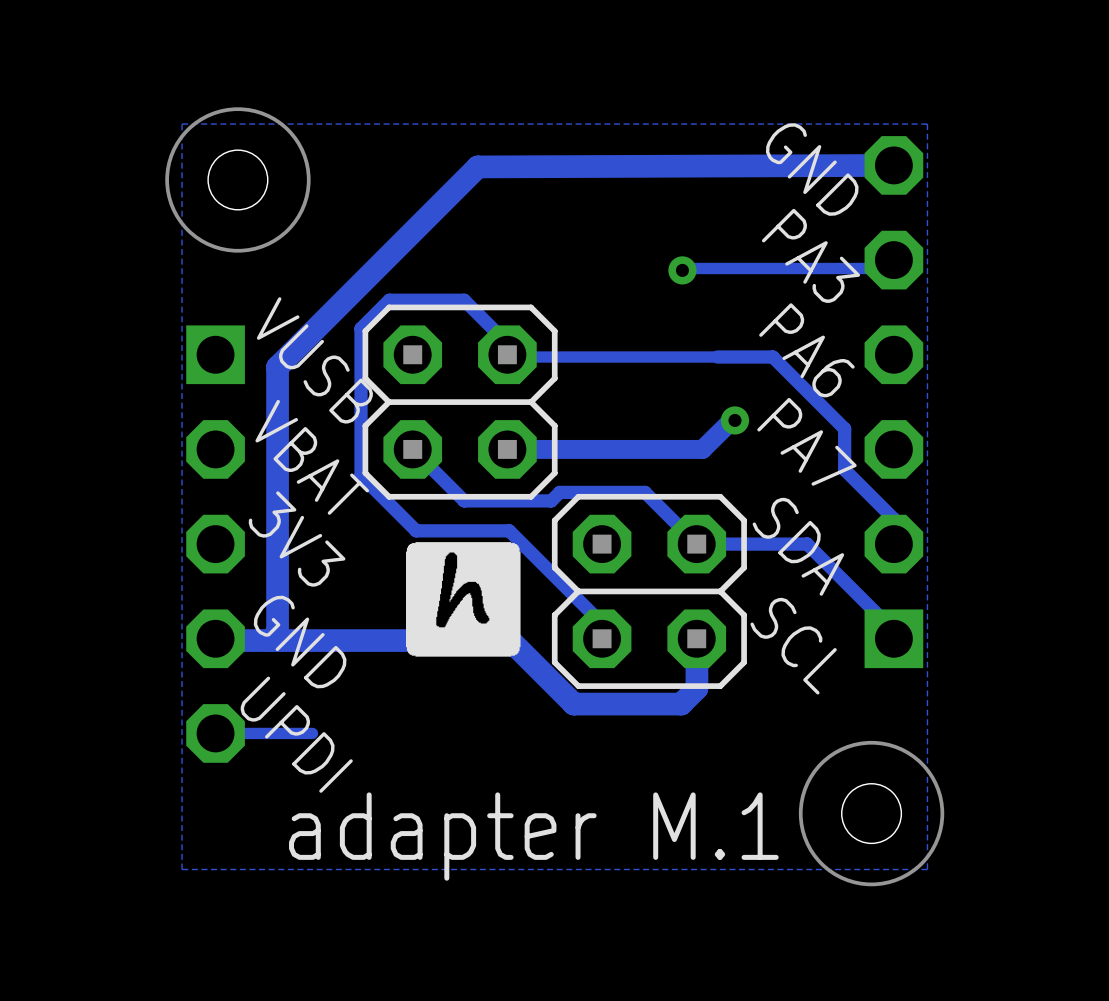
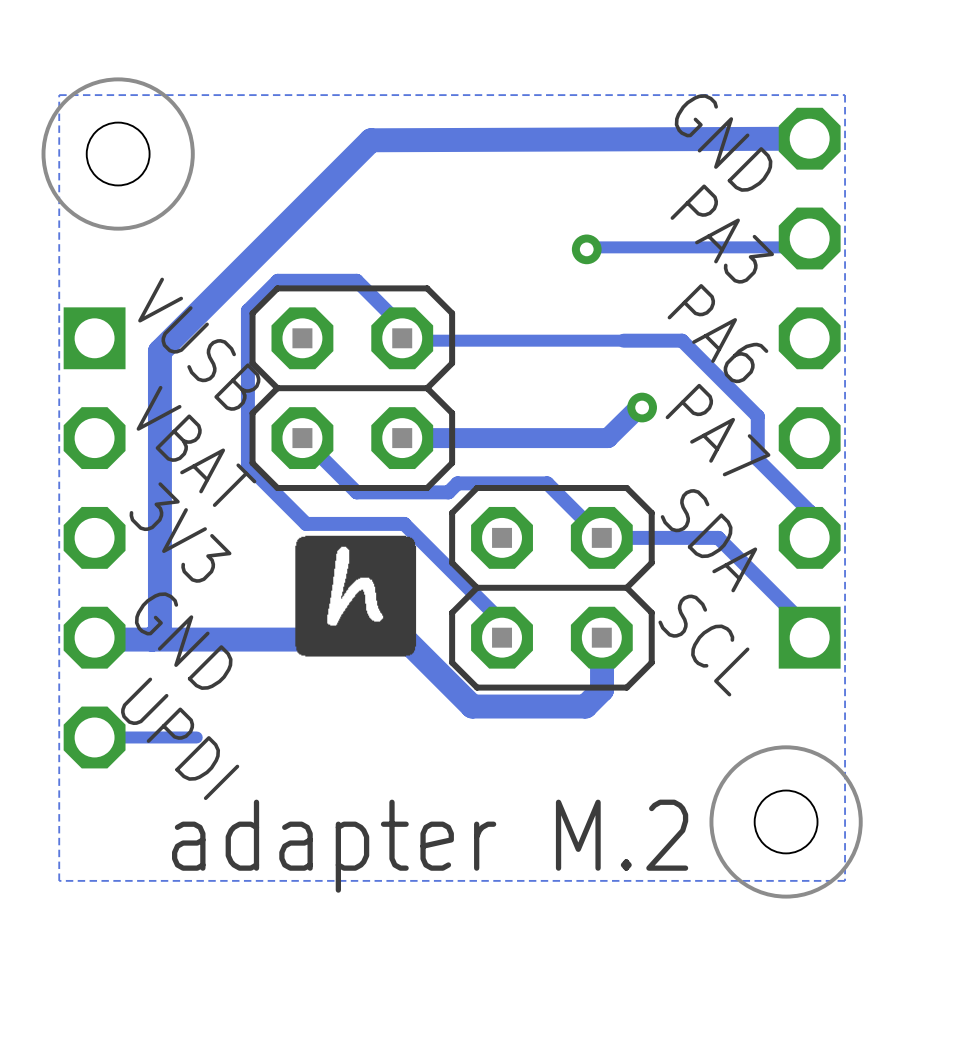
text: adapter M.1 (533, 836) -> adapter M.2 (430, 846)

